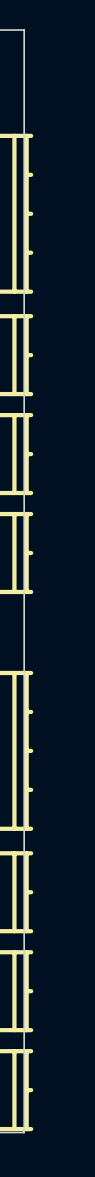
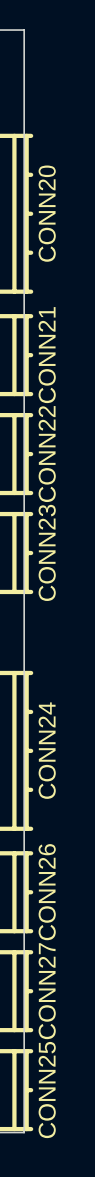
CONN20 name: none -> CONN20 (47, 213)
CONN21 name: none -> CONN21 (47, 355)
CONN22 name: none -> CONN22 (47, 454)
CONN23 name: none -> CONN23 (47, 552)
CONN24 name: none -> CONN24 (47, 750)
CONN26 name: none -> CONN26 (47, 892)
CONN27 name: none -> CONN27 (47, 991)
CONN25 name: none -> CONN25 (47, 1090)

